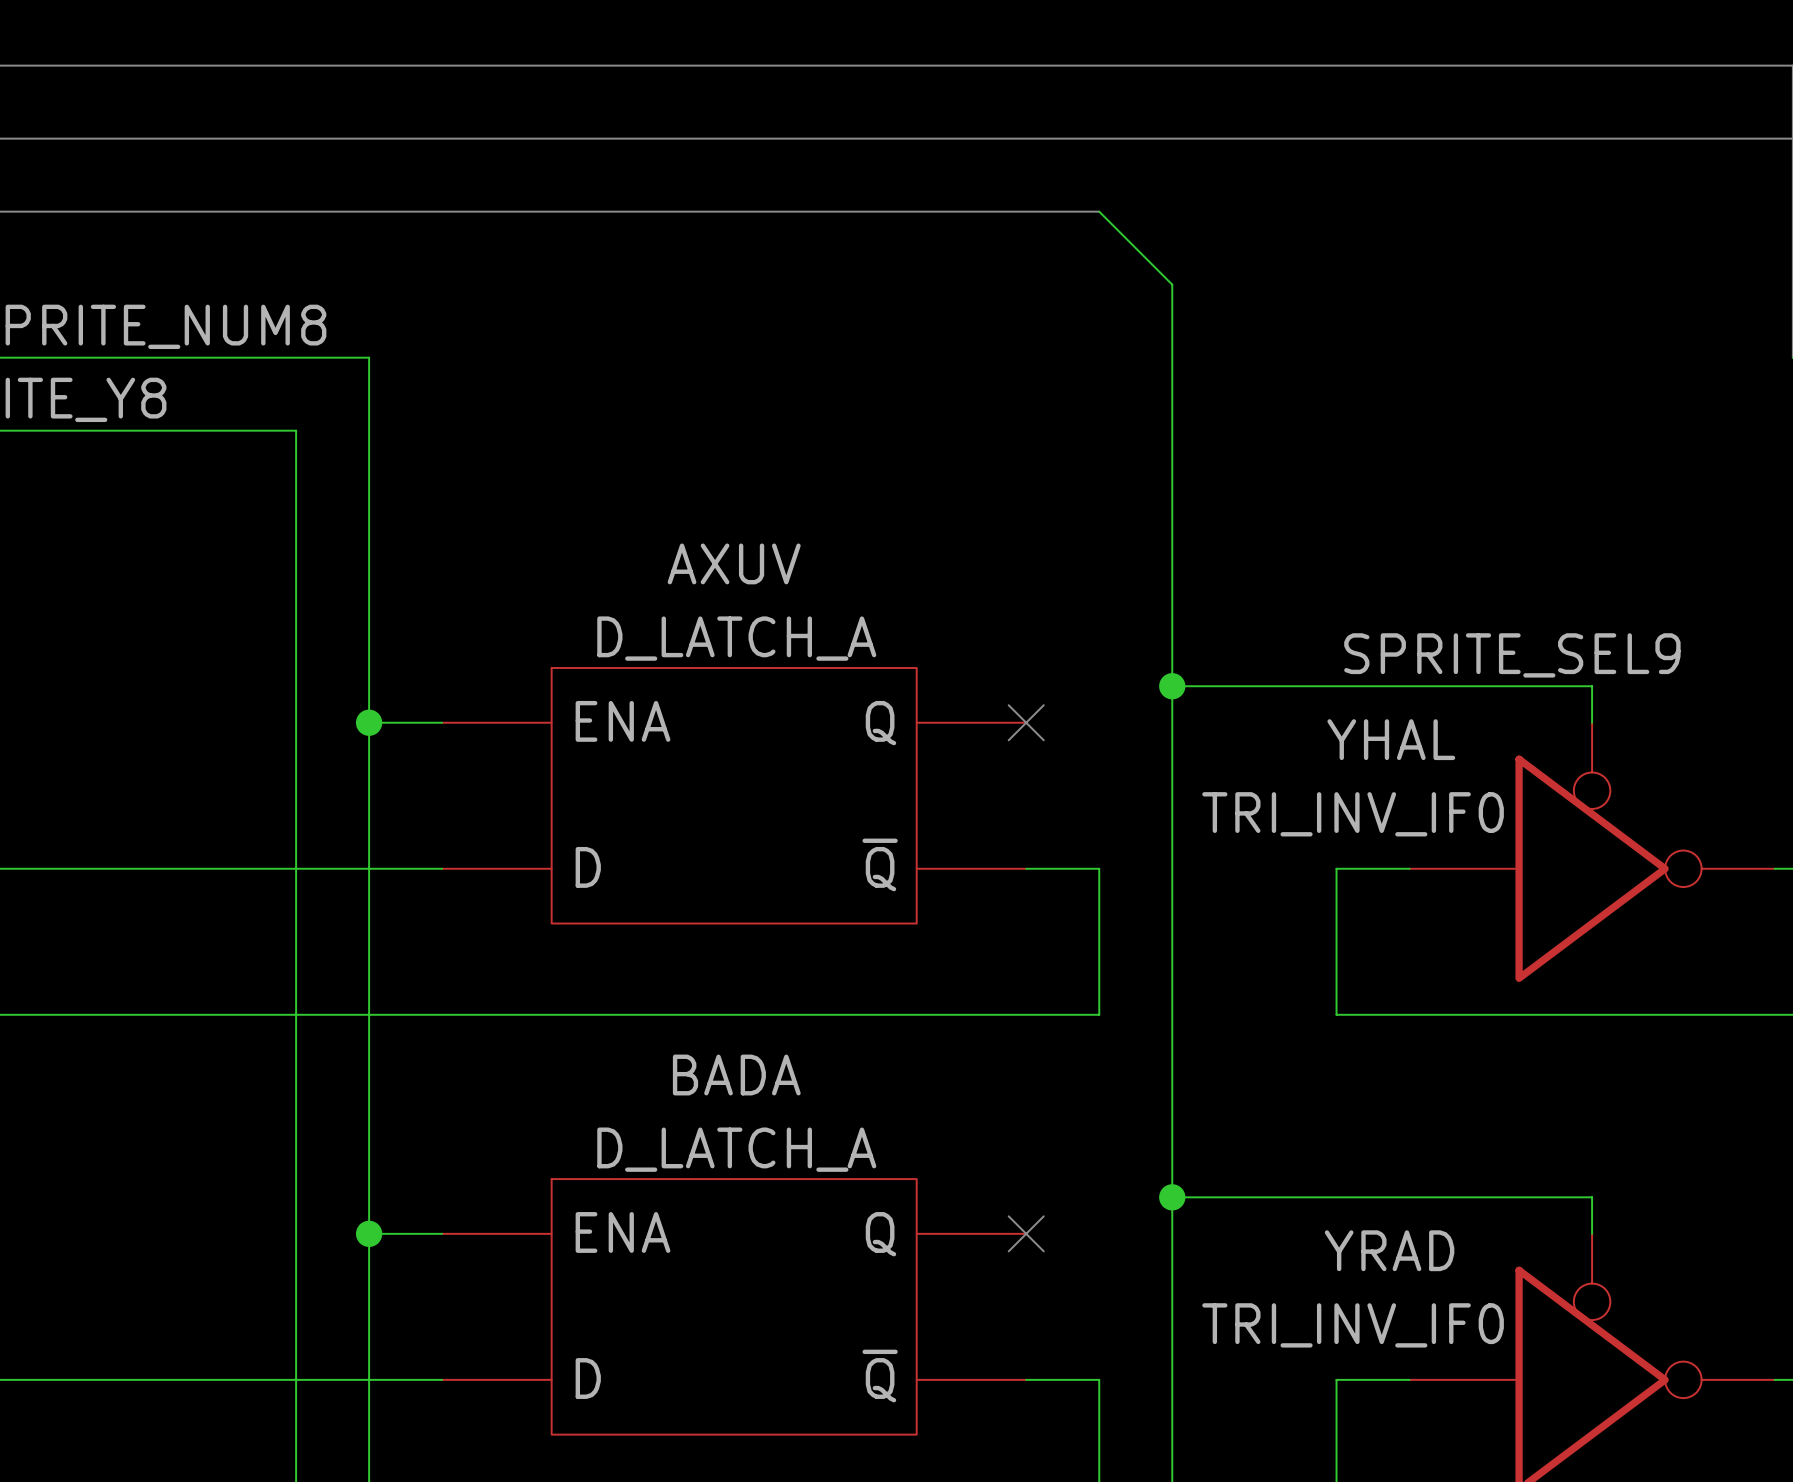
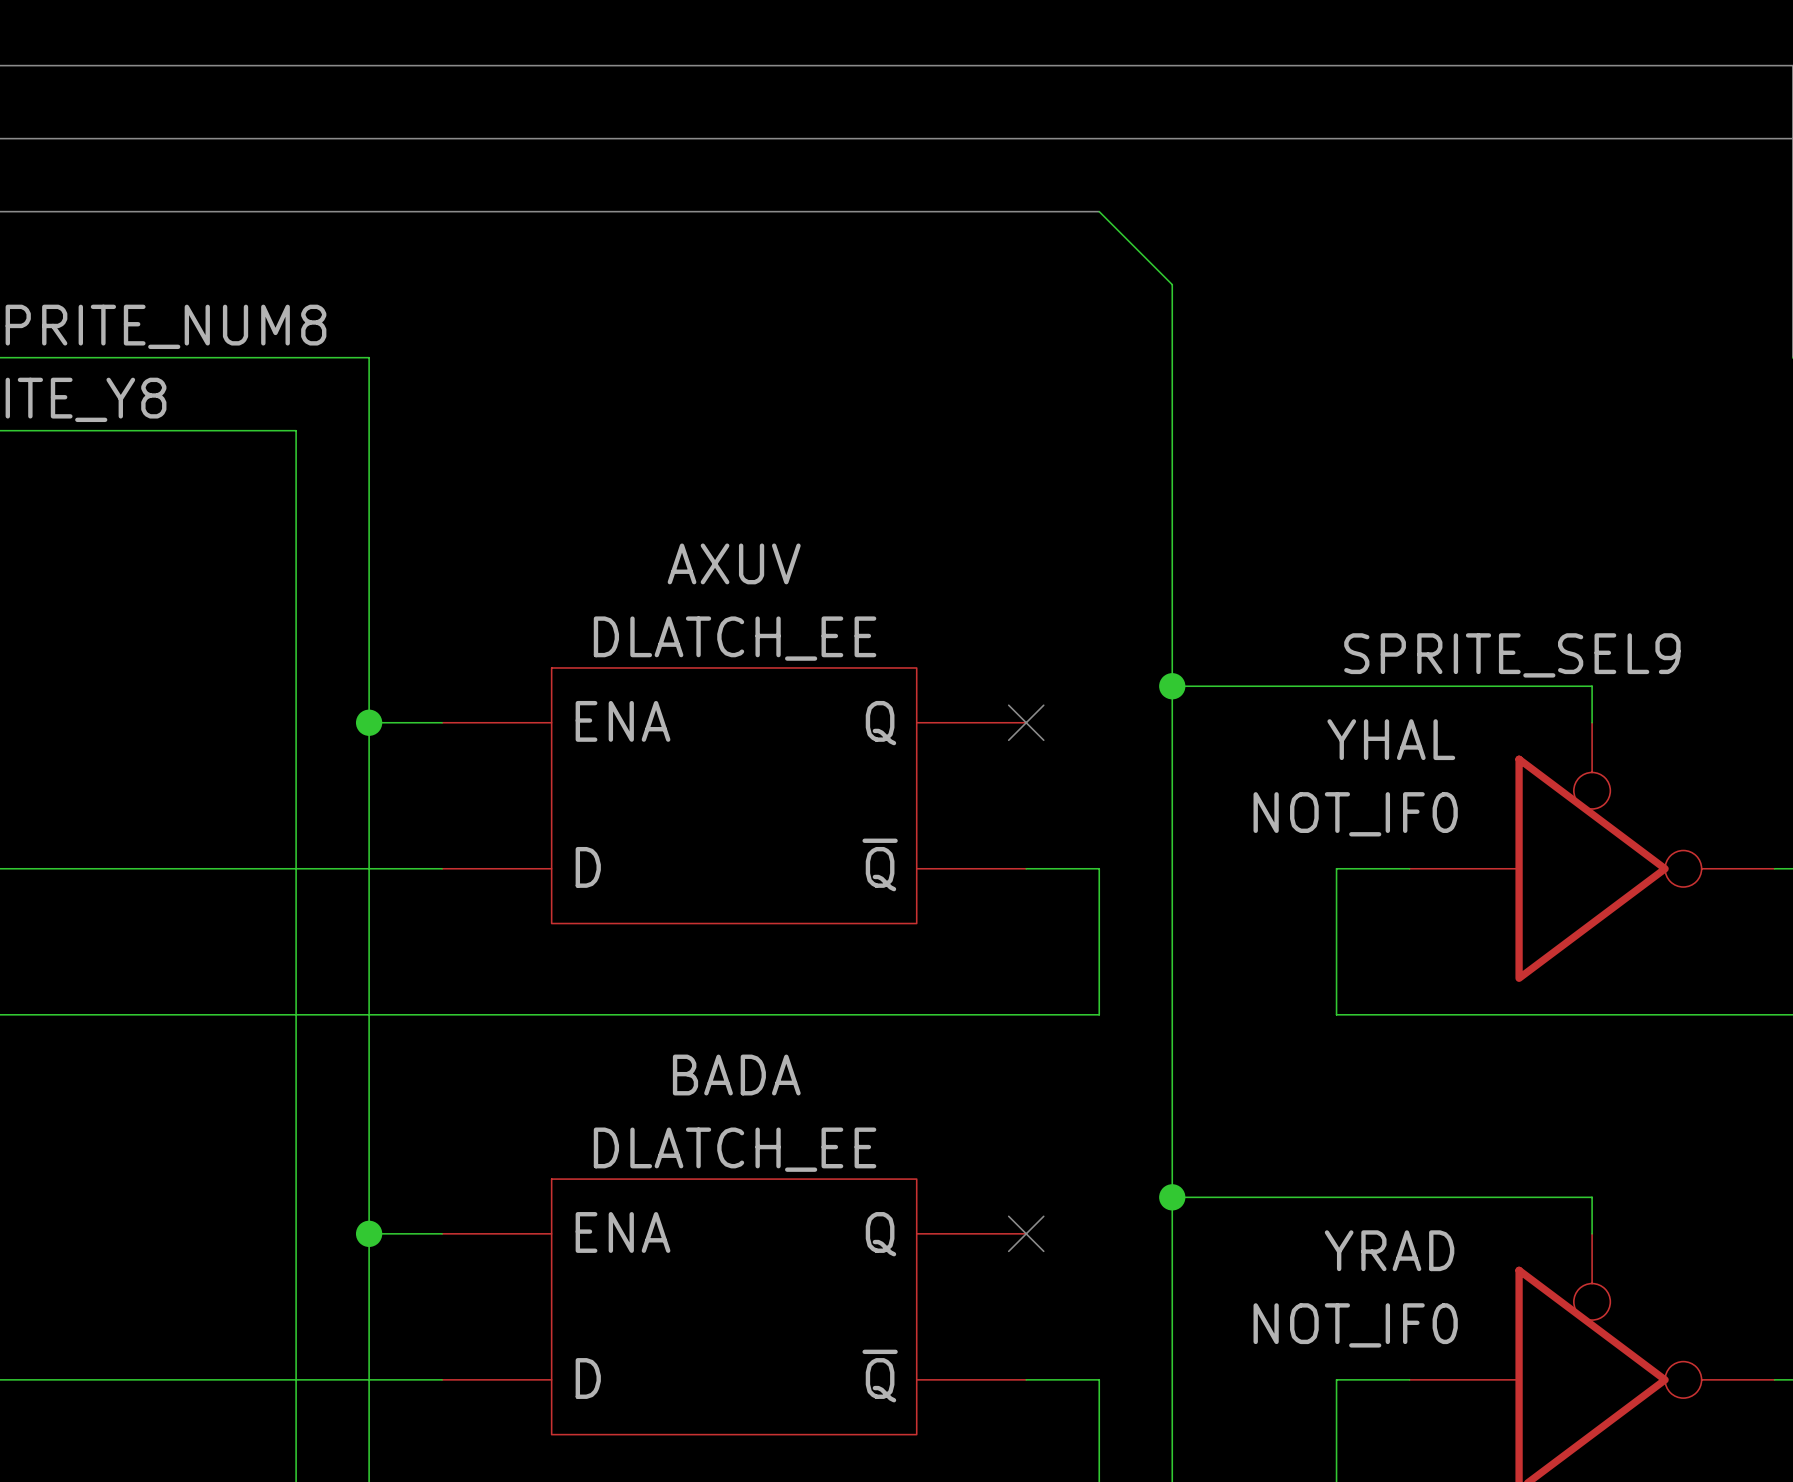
AXUV value: D_LATCH_A (736, 638) -> DLATCH_EE (735, 638)
YHAL value: TRI_INV_IF0 (1353, 814) -> NOT_IF0 (1355, 814)
BADA value: D_LATCH_A (736, 1149) -> DLATCH_EE (735, 1149)
YRAD value: TRI_INV_IF0 (1353, 1325) -> NOT_IF0 (1355, 1325)

